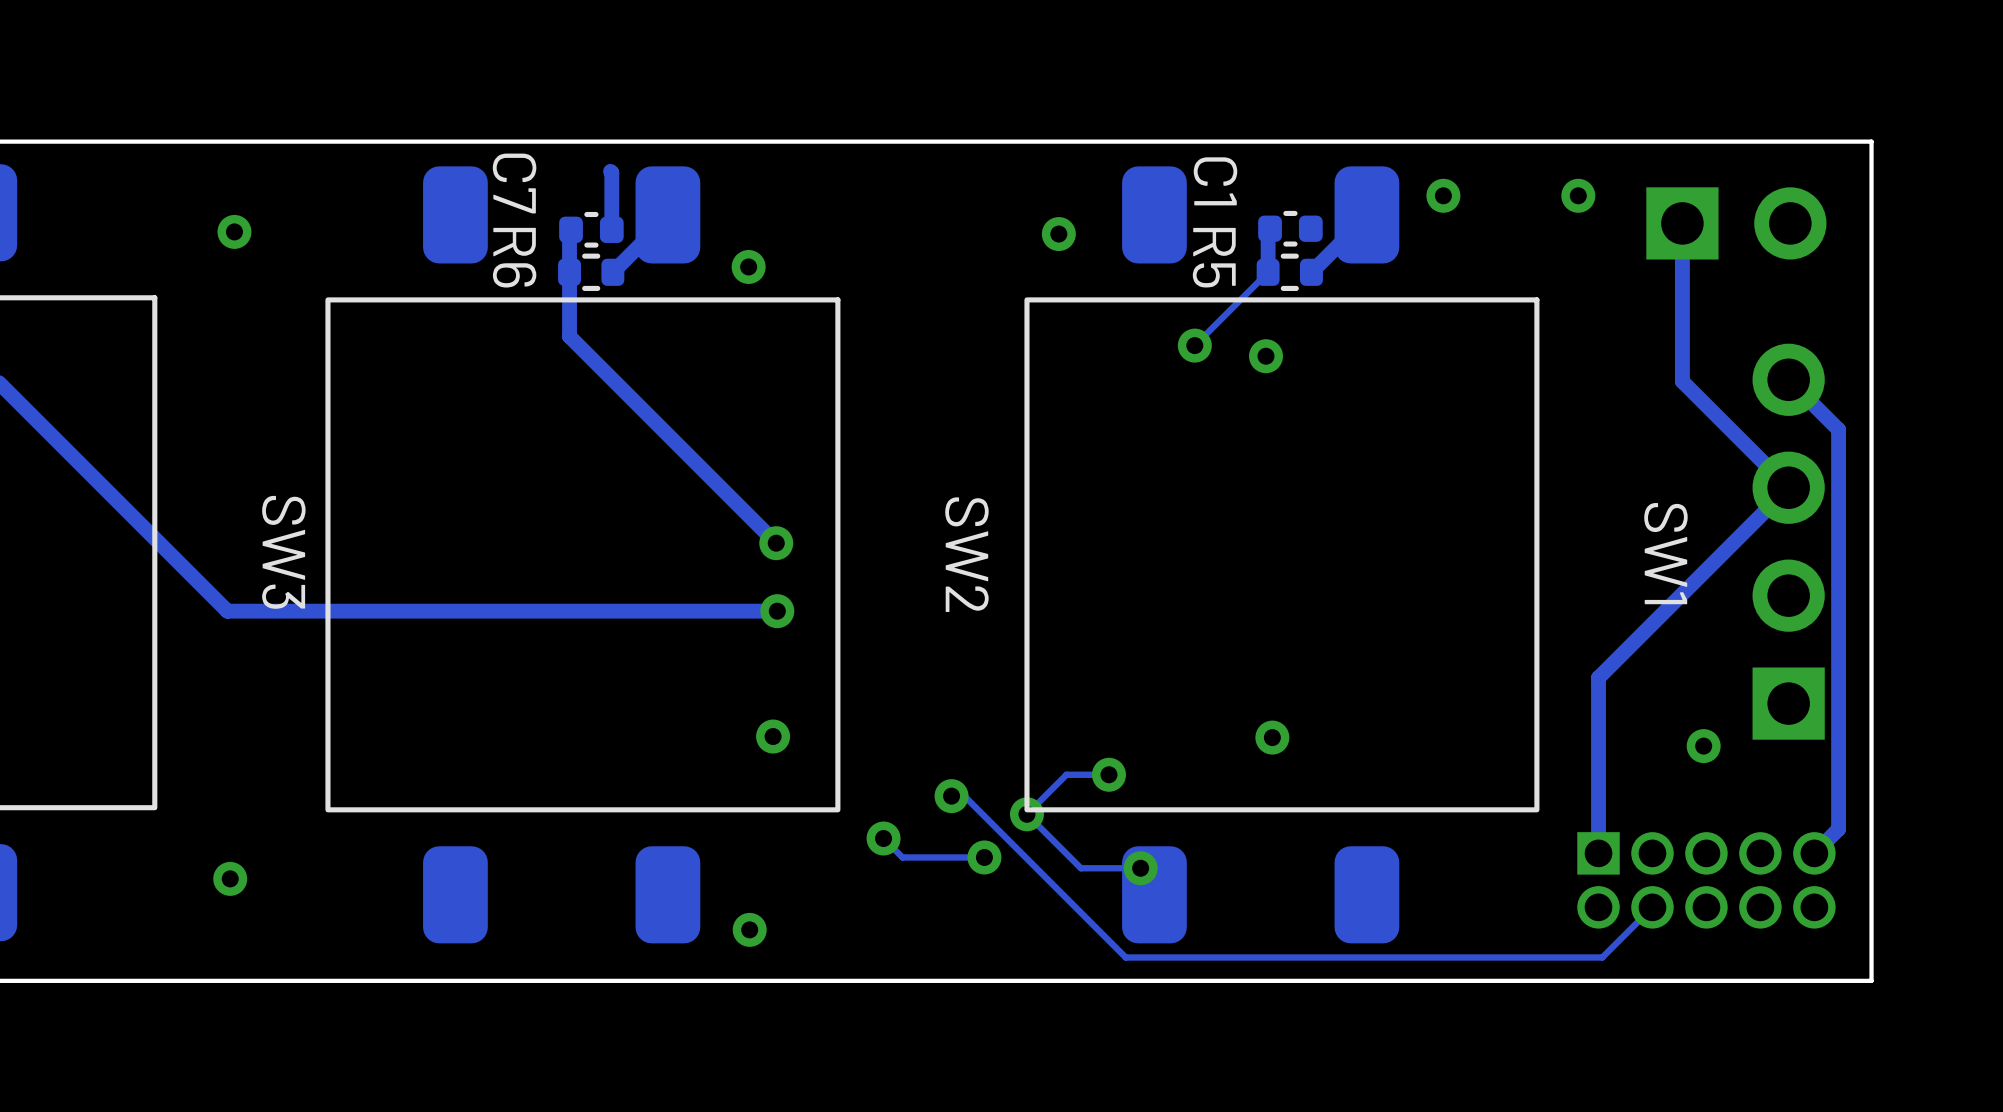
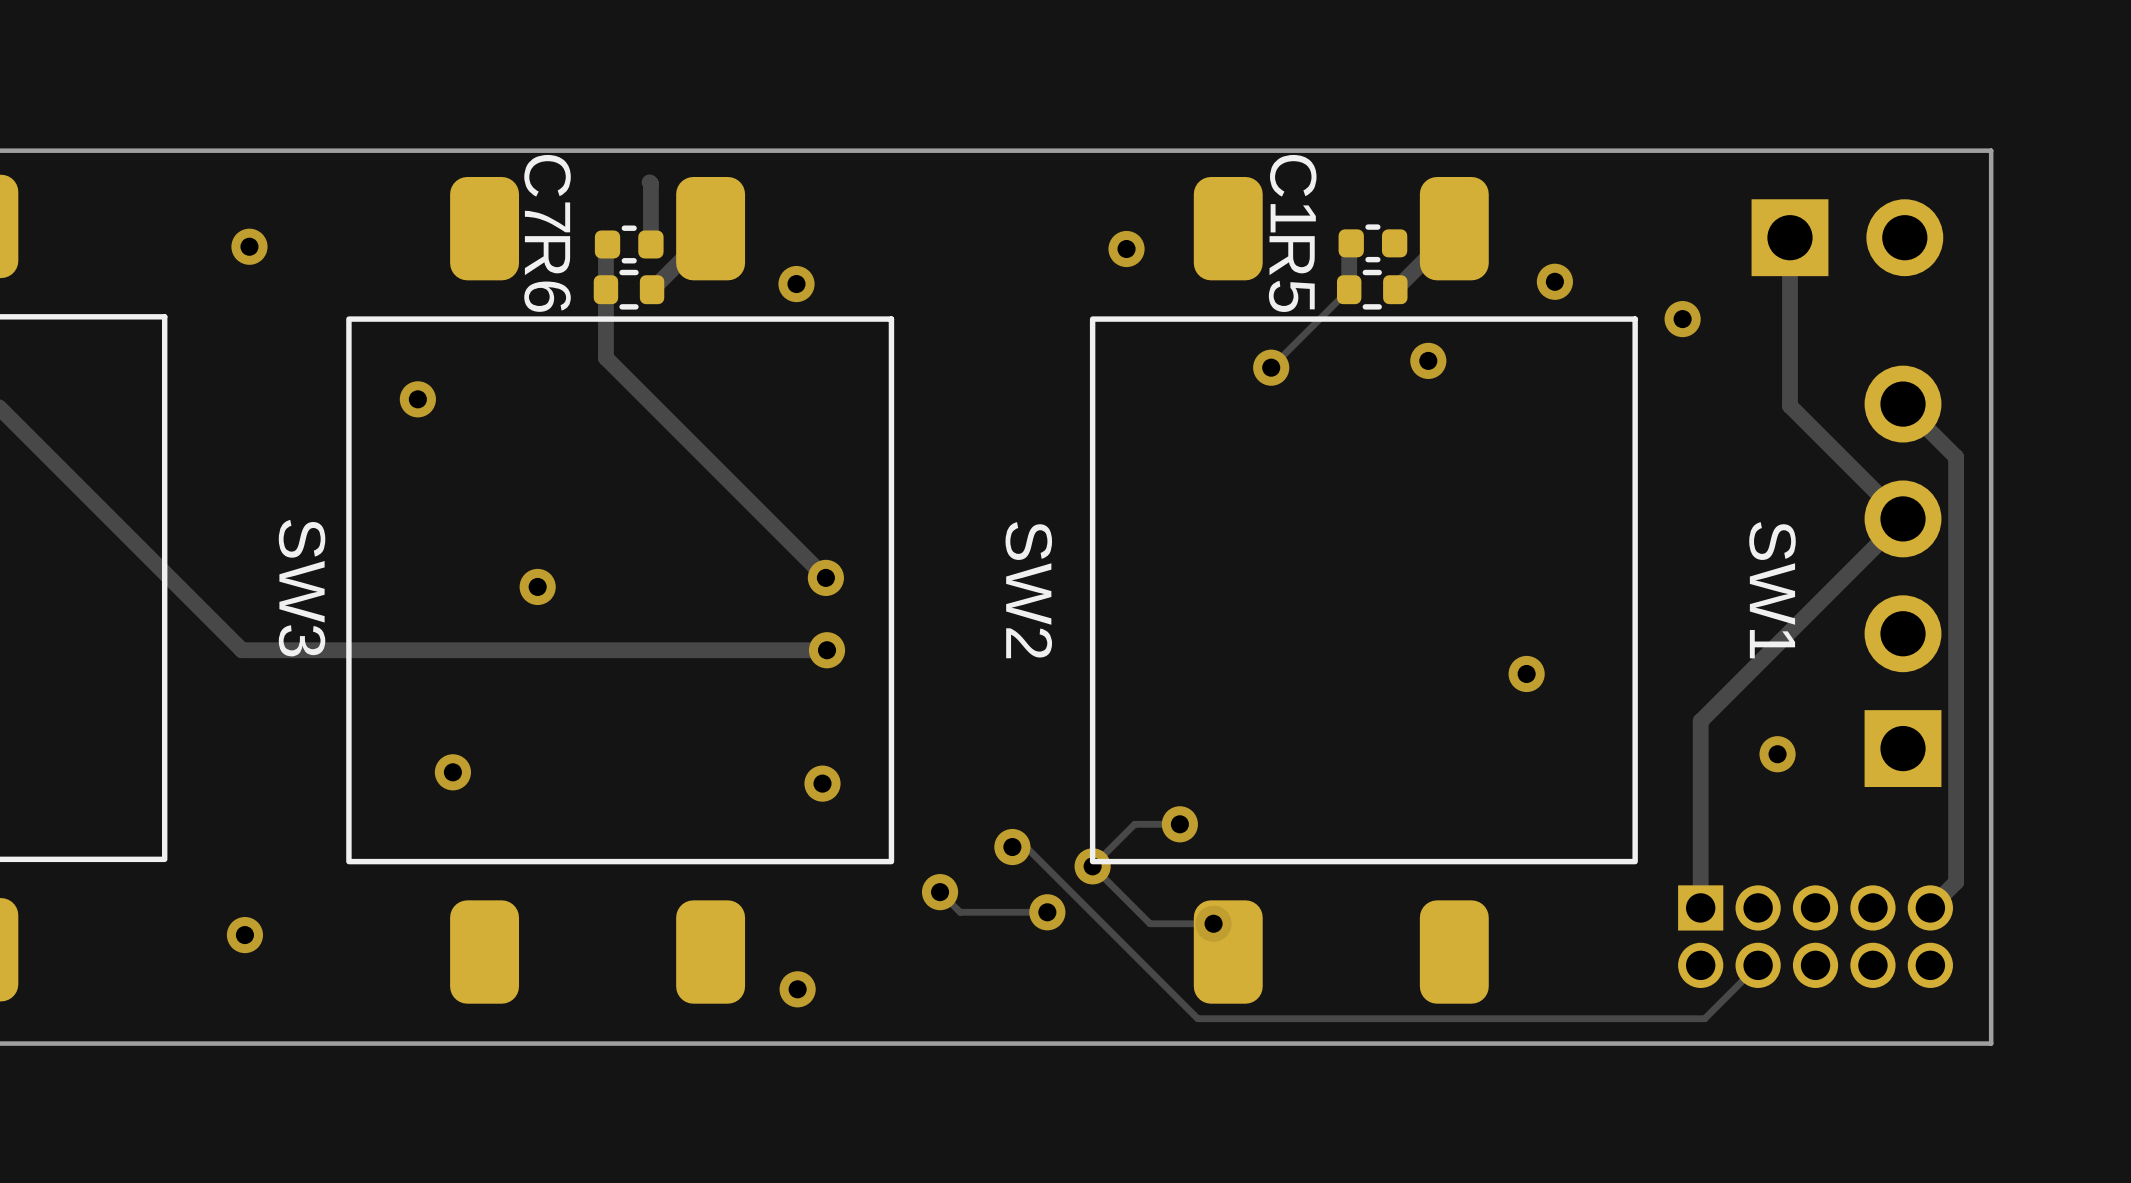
via: (1443, 195) -> none
via: (1578, 195) -> none
via: none -> (1554, 281)
via: none -> (1682, 319)
via position: (1266, 356) -> (1428, 360)
via: none -> (417, 399)
via: none -> (537, 586)
via: none -> (1526, 673)
via: none -> (452, 772)
via: (1272, 737) -> none
via position: (1703, 746) -> (1777, 754)

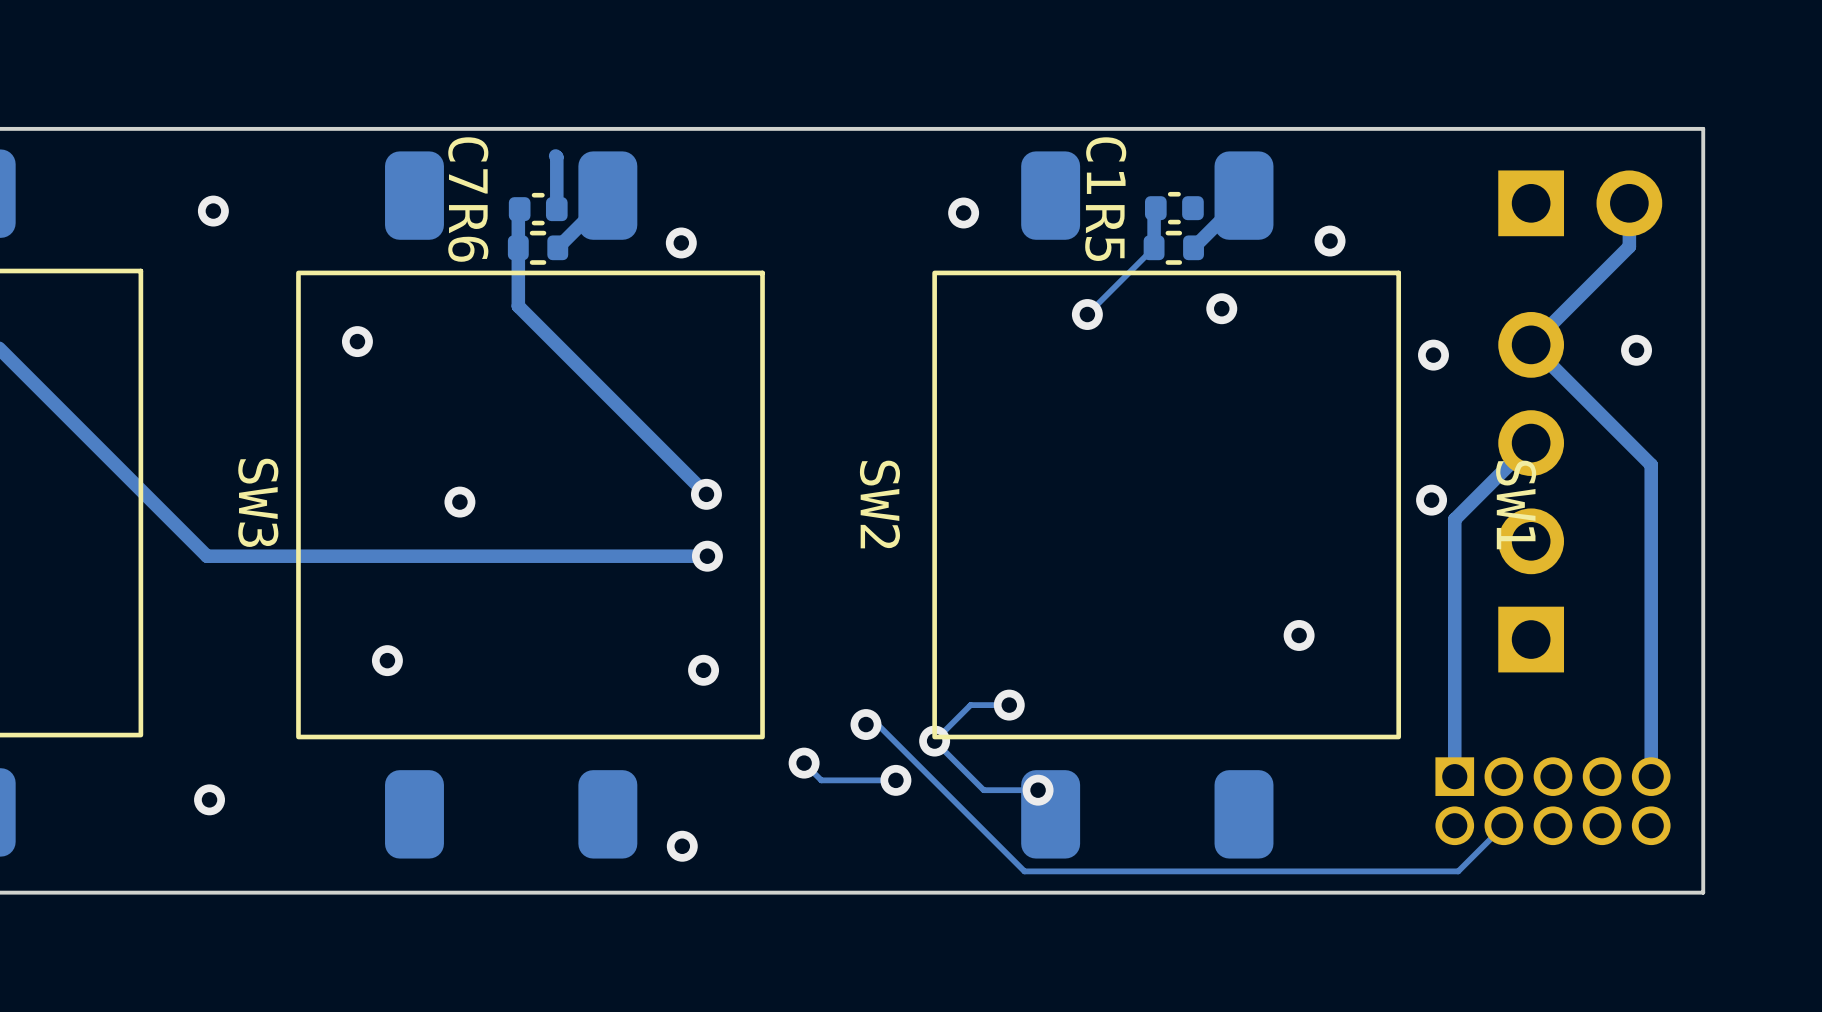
track: (1789, 237) (1789, 405) (1903, 518) (1700, 721) -> (1531, 443) (1454, 519) (1454, 616)
via position: (1682, 319) -> (1433, 355)
track: (1903, 404) (1956, 457) (1956, 882) (1930, 907) -> (1628, 203) (1629, 246) (1531, 344) (1651, 464) (1651, 776)
via: none -> (1636, 350)
part position: (1903, 576) -> (1531, 492)
via: none -> (1431, 500)
via position: (1526, 673) -> (1299, 635)
via: (1777, 754) -> none

